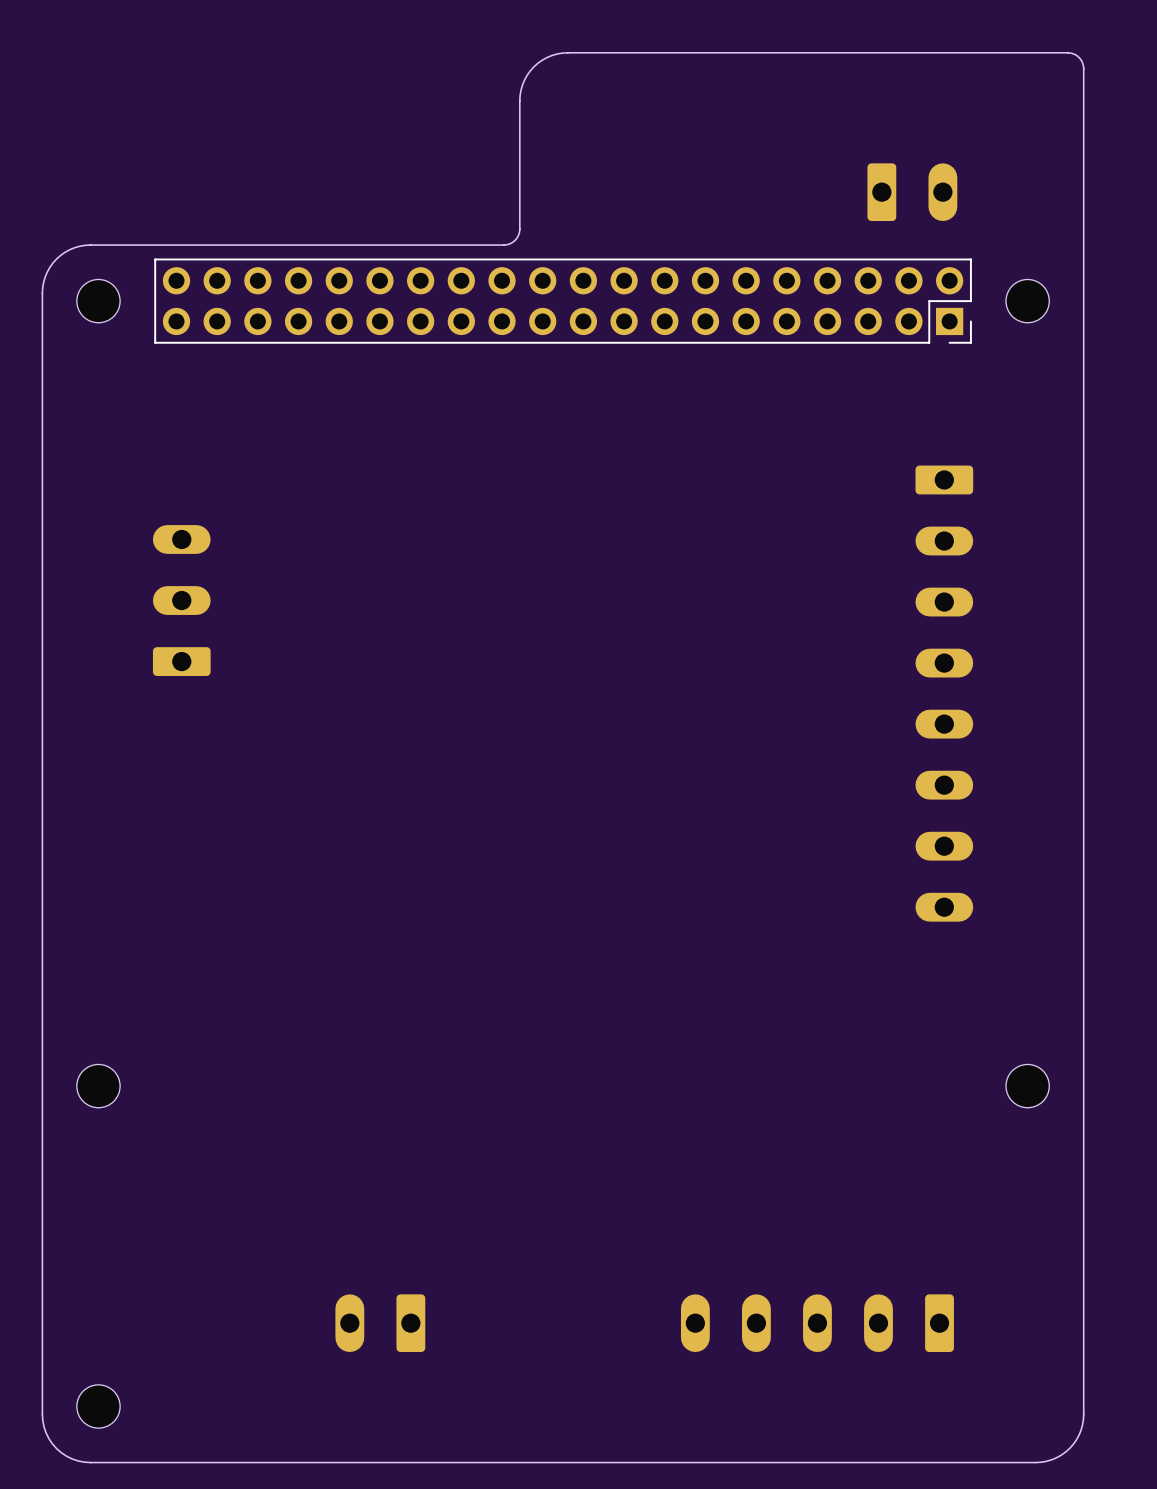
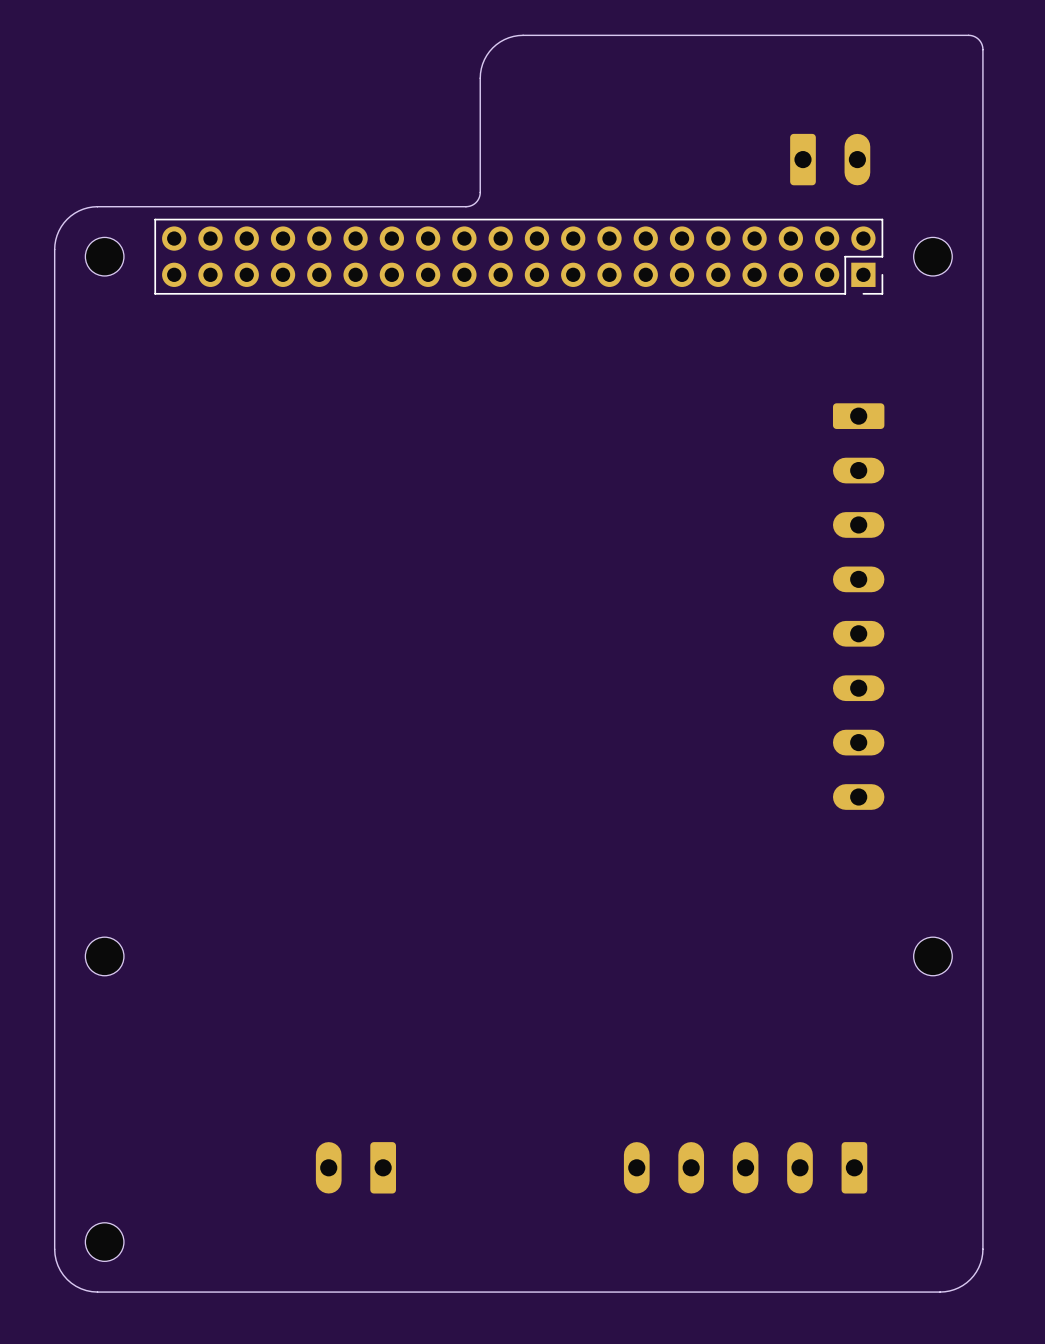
part: (181, 600) -> none

